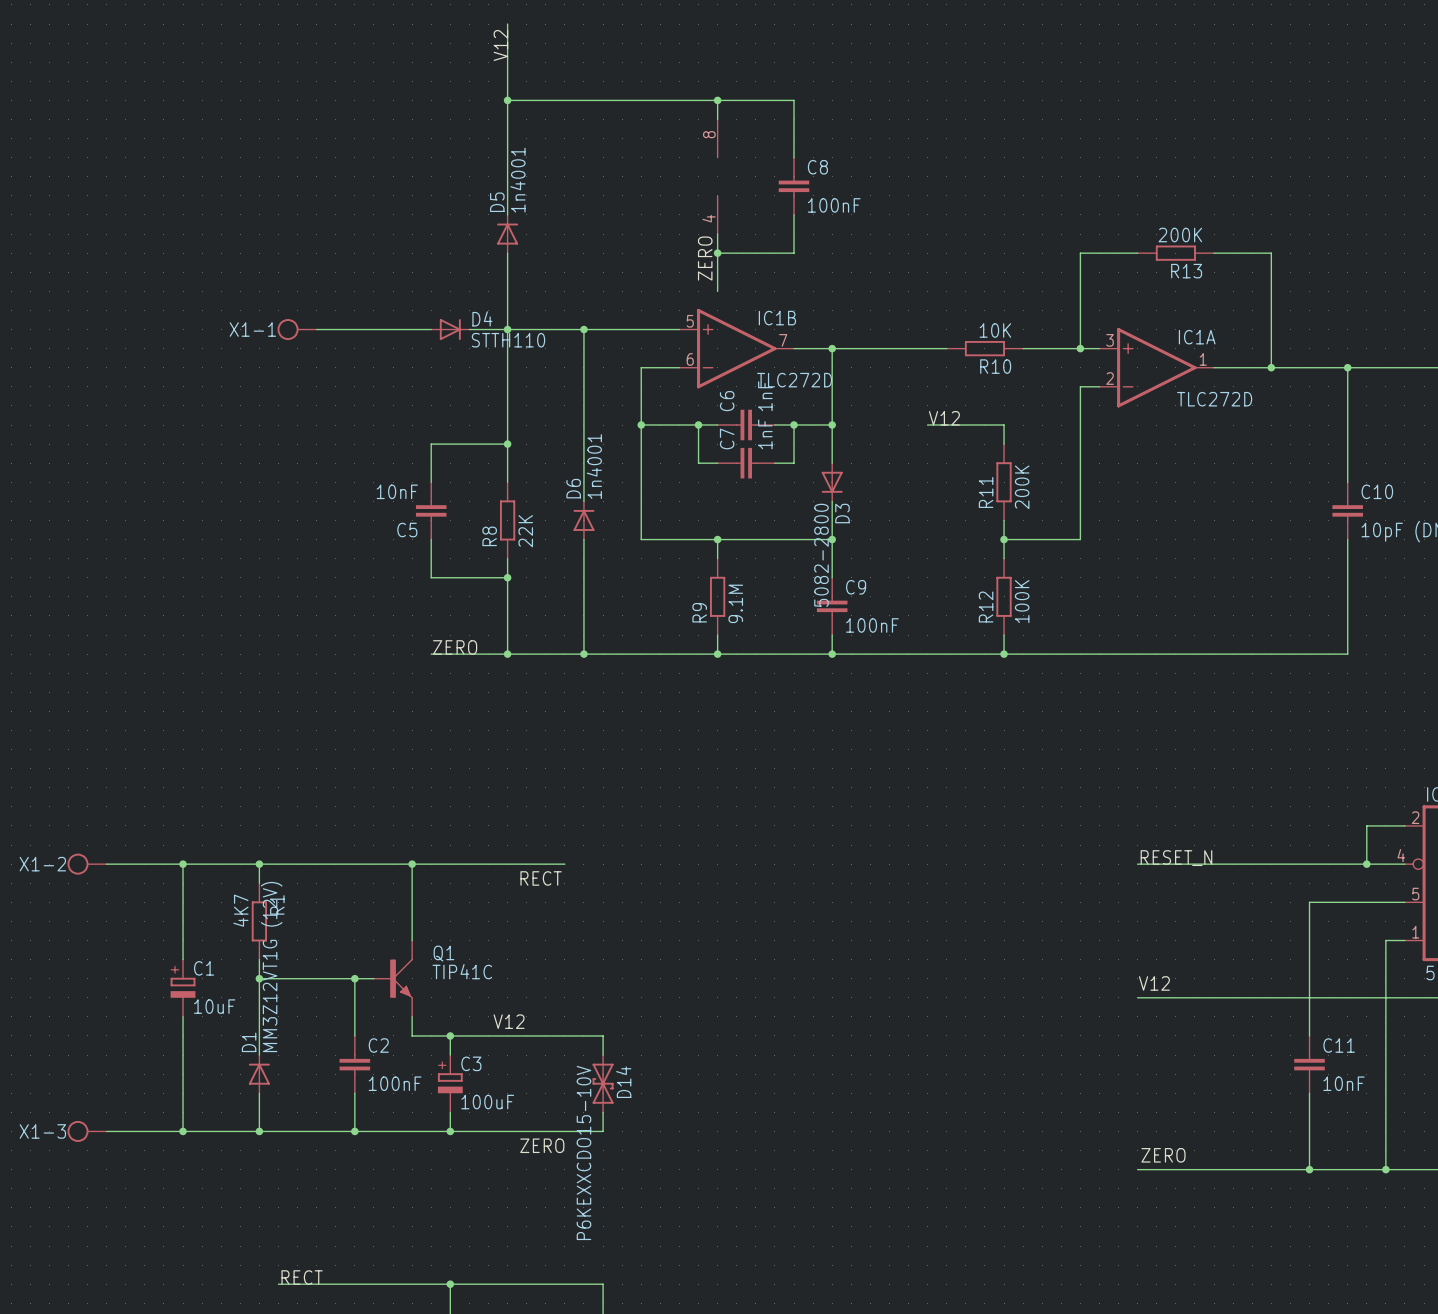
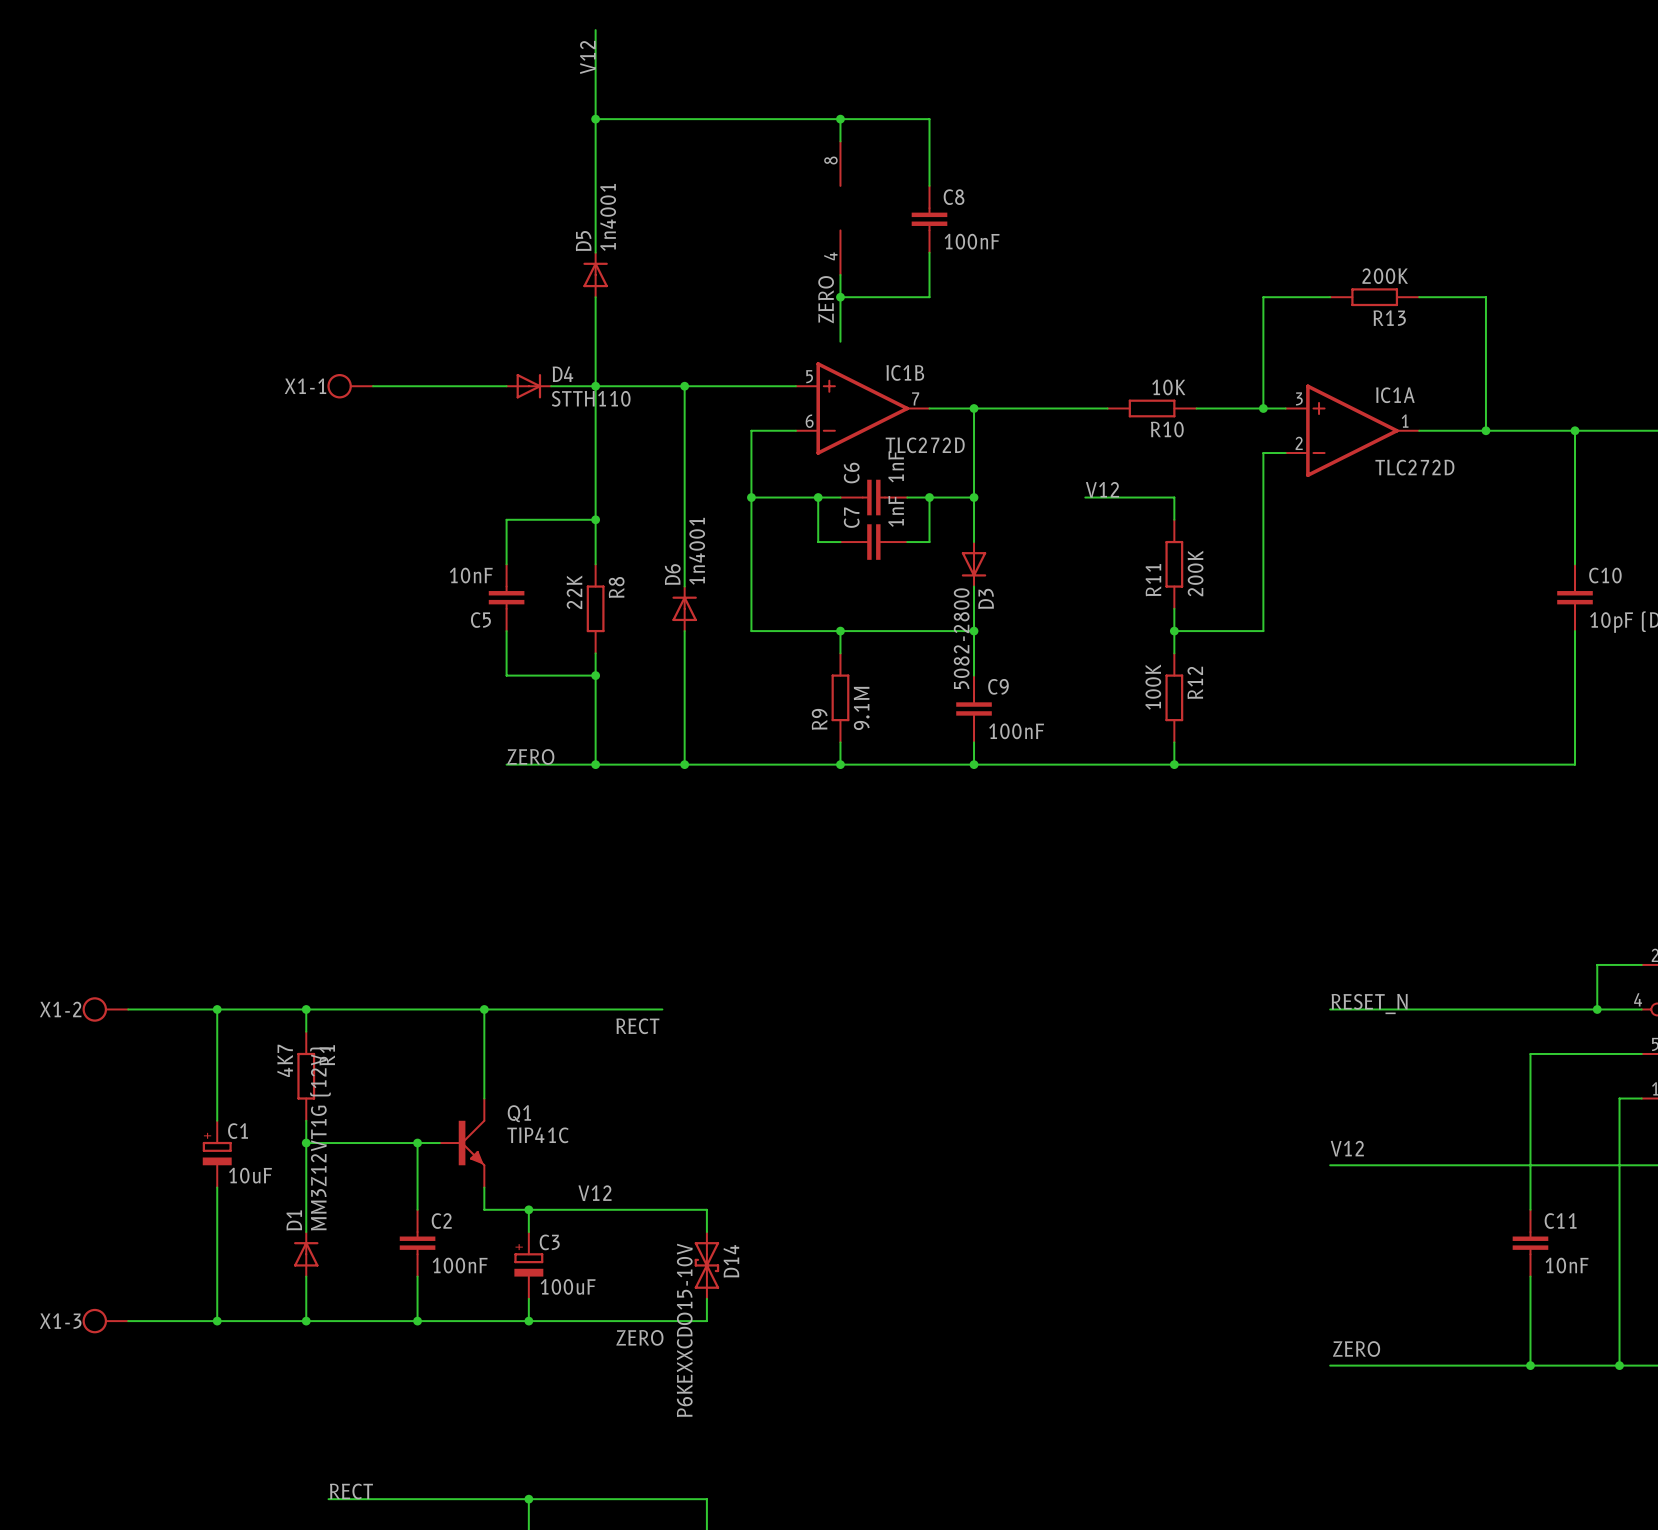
R8 value position: 22K (525, 531) -> 22K (574, 592)
R8 name position: R8 (489, 536) -> R8 (616, 587)
R12 value position: 100K (1022, 601) -> 100K (1153, 687)
R12 name position: R12 (986, 607) -> R12 (1195, 682)

